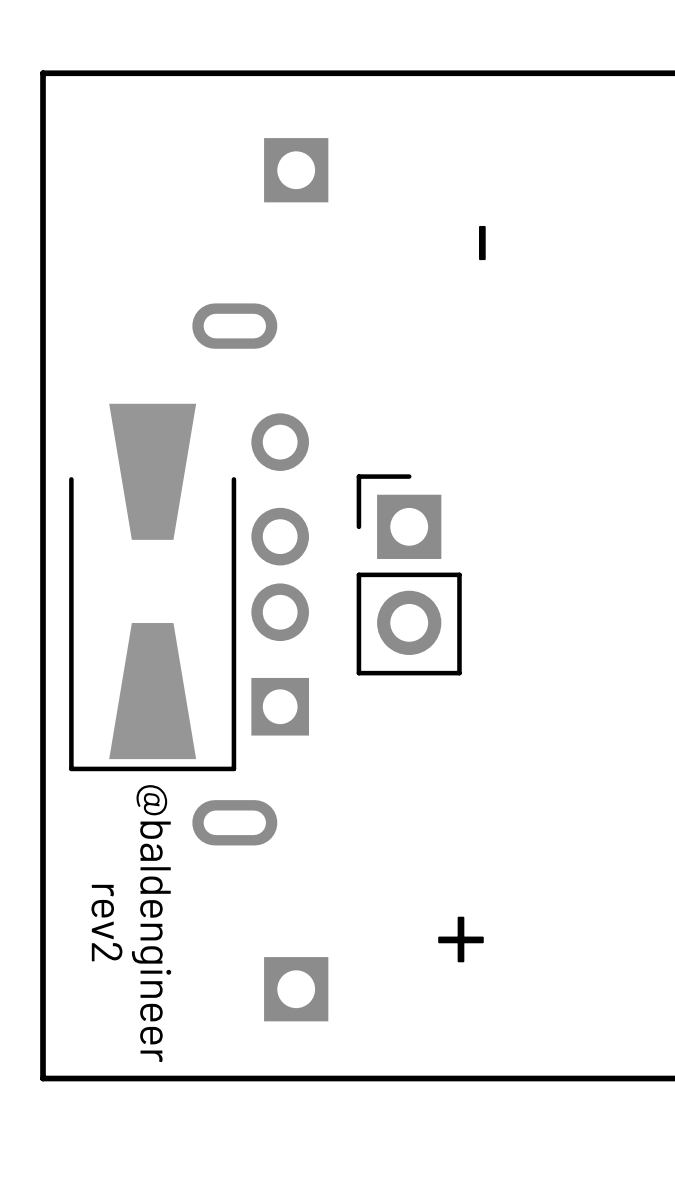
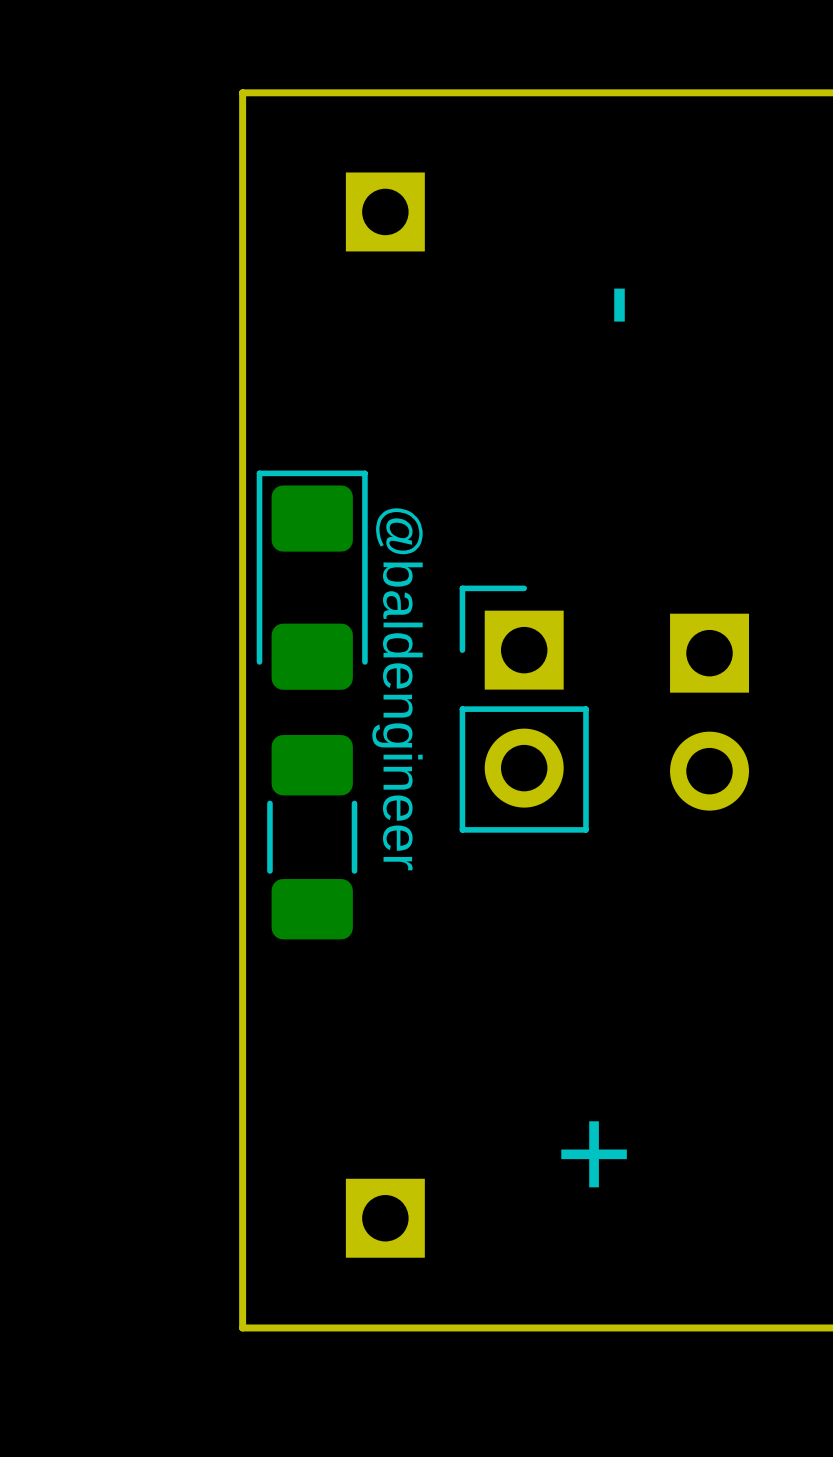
board edge: (180, 73) (43, 73) (43, 1078) (180, 1078) -> (242, 92) (242, 1327)
part: none -> (312, 580)
part: (250, 574) -> none
part: none -> (709, 712)
part: (152, 587) -> none
part: none -> (312, 837)
text: rev2 (106, 923) -> none
text position: @baldengineer (151, 923) -> @baldengineer (397, 689)

